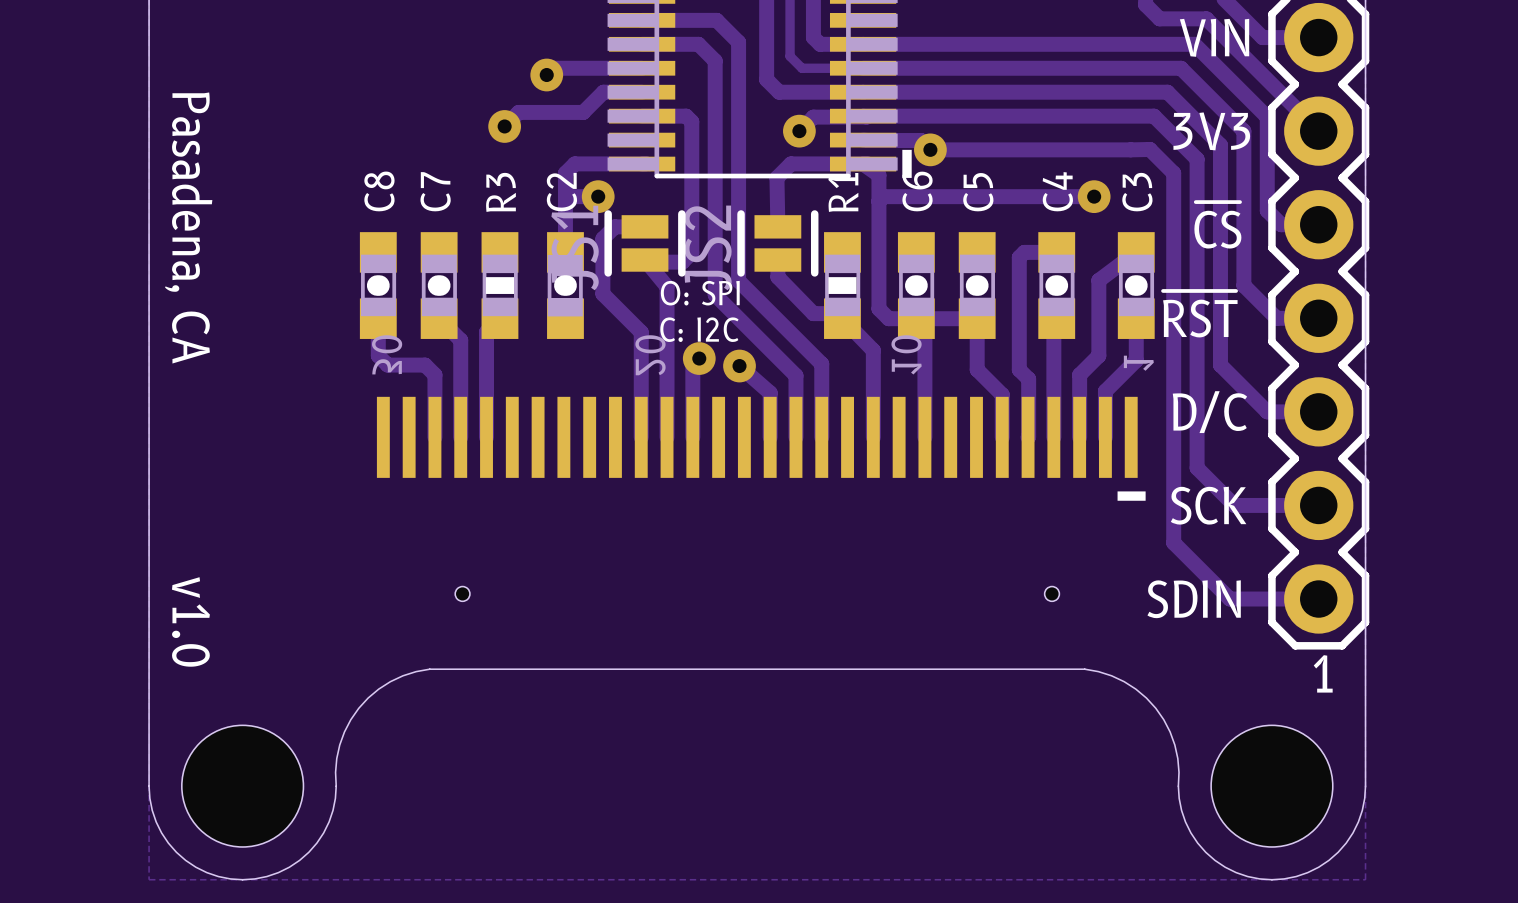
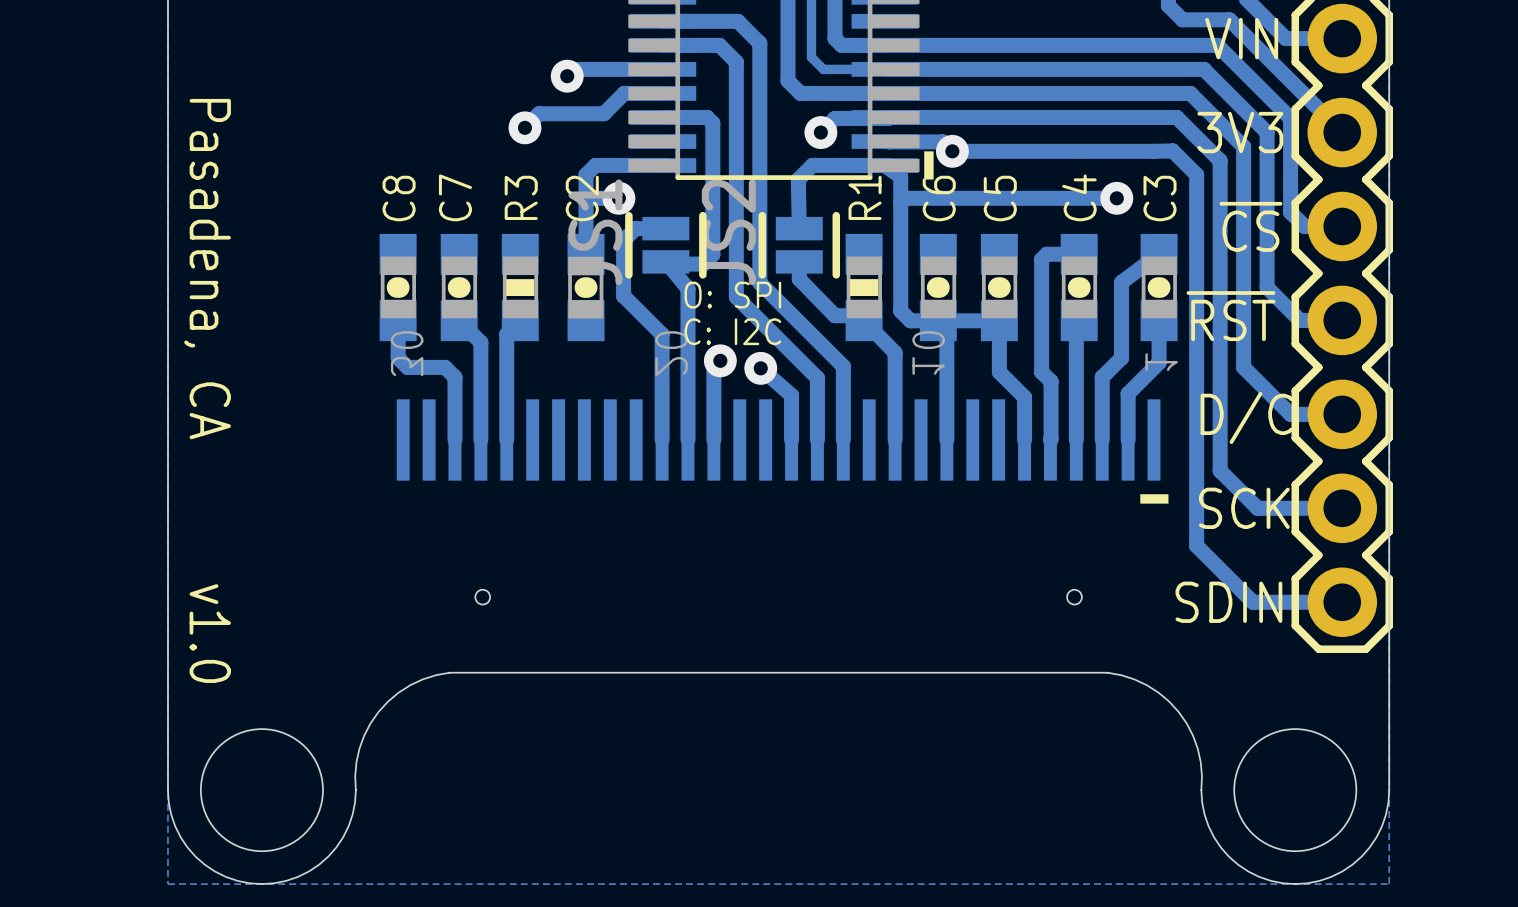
text: 1 (1323, 673) -> none

